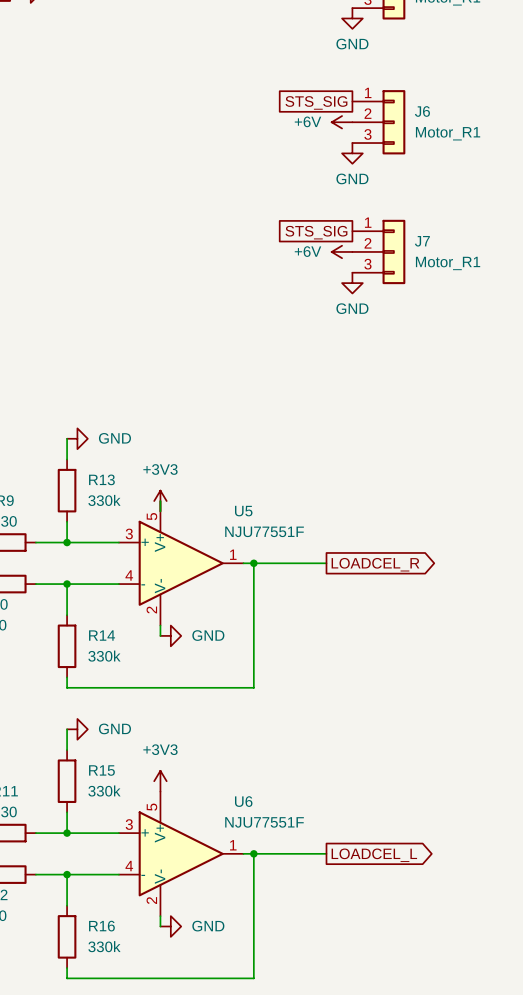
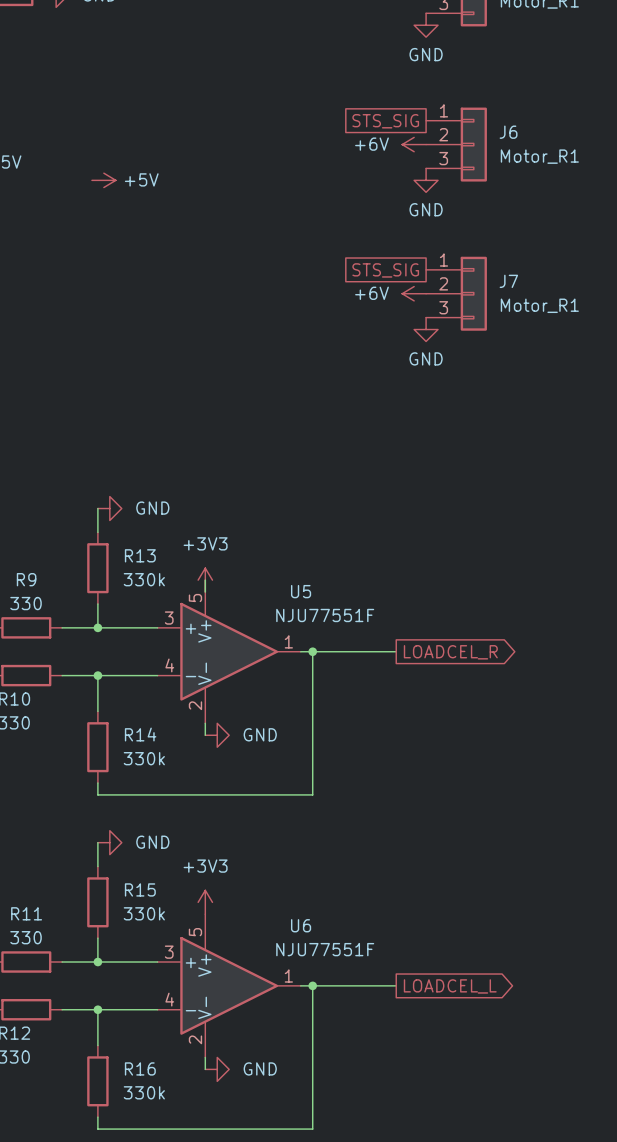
power symbol: none -> +5V (103, 180)

